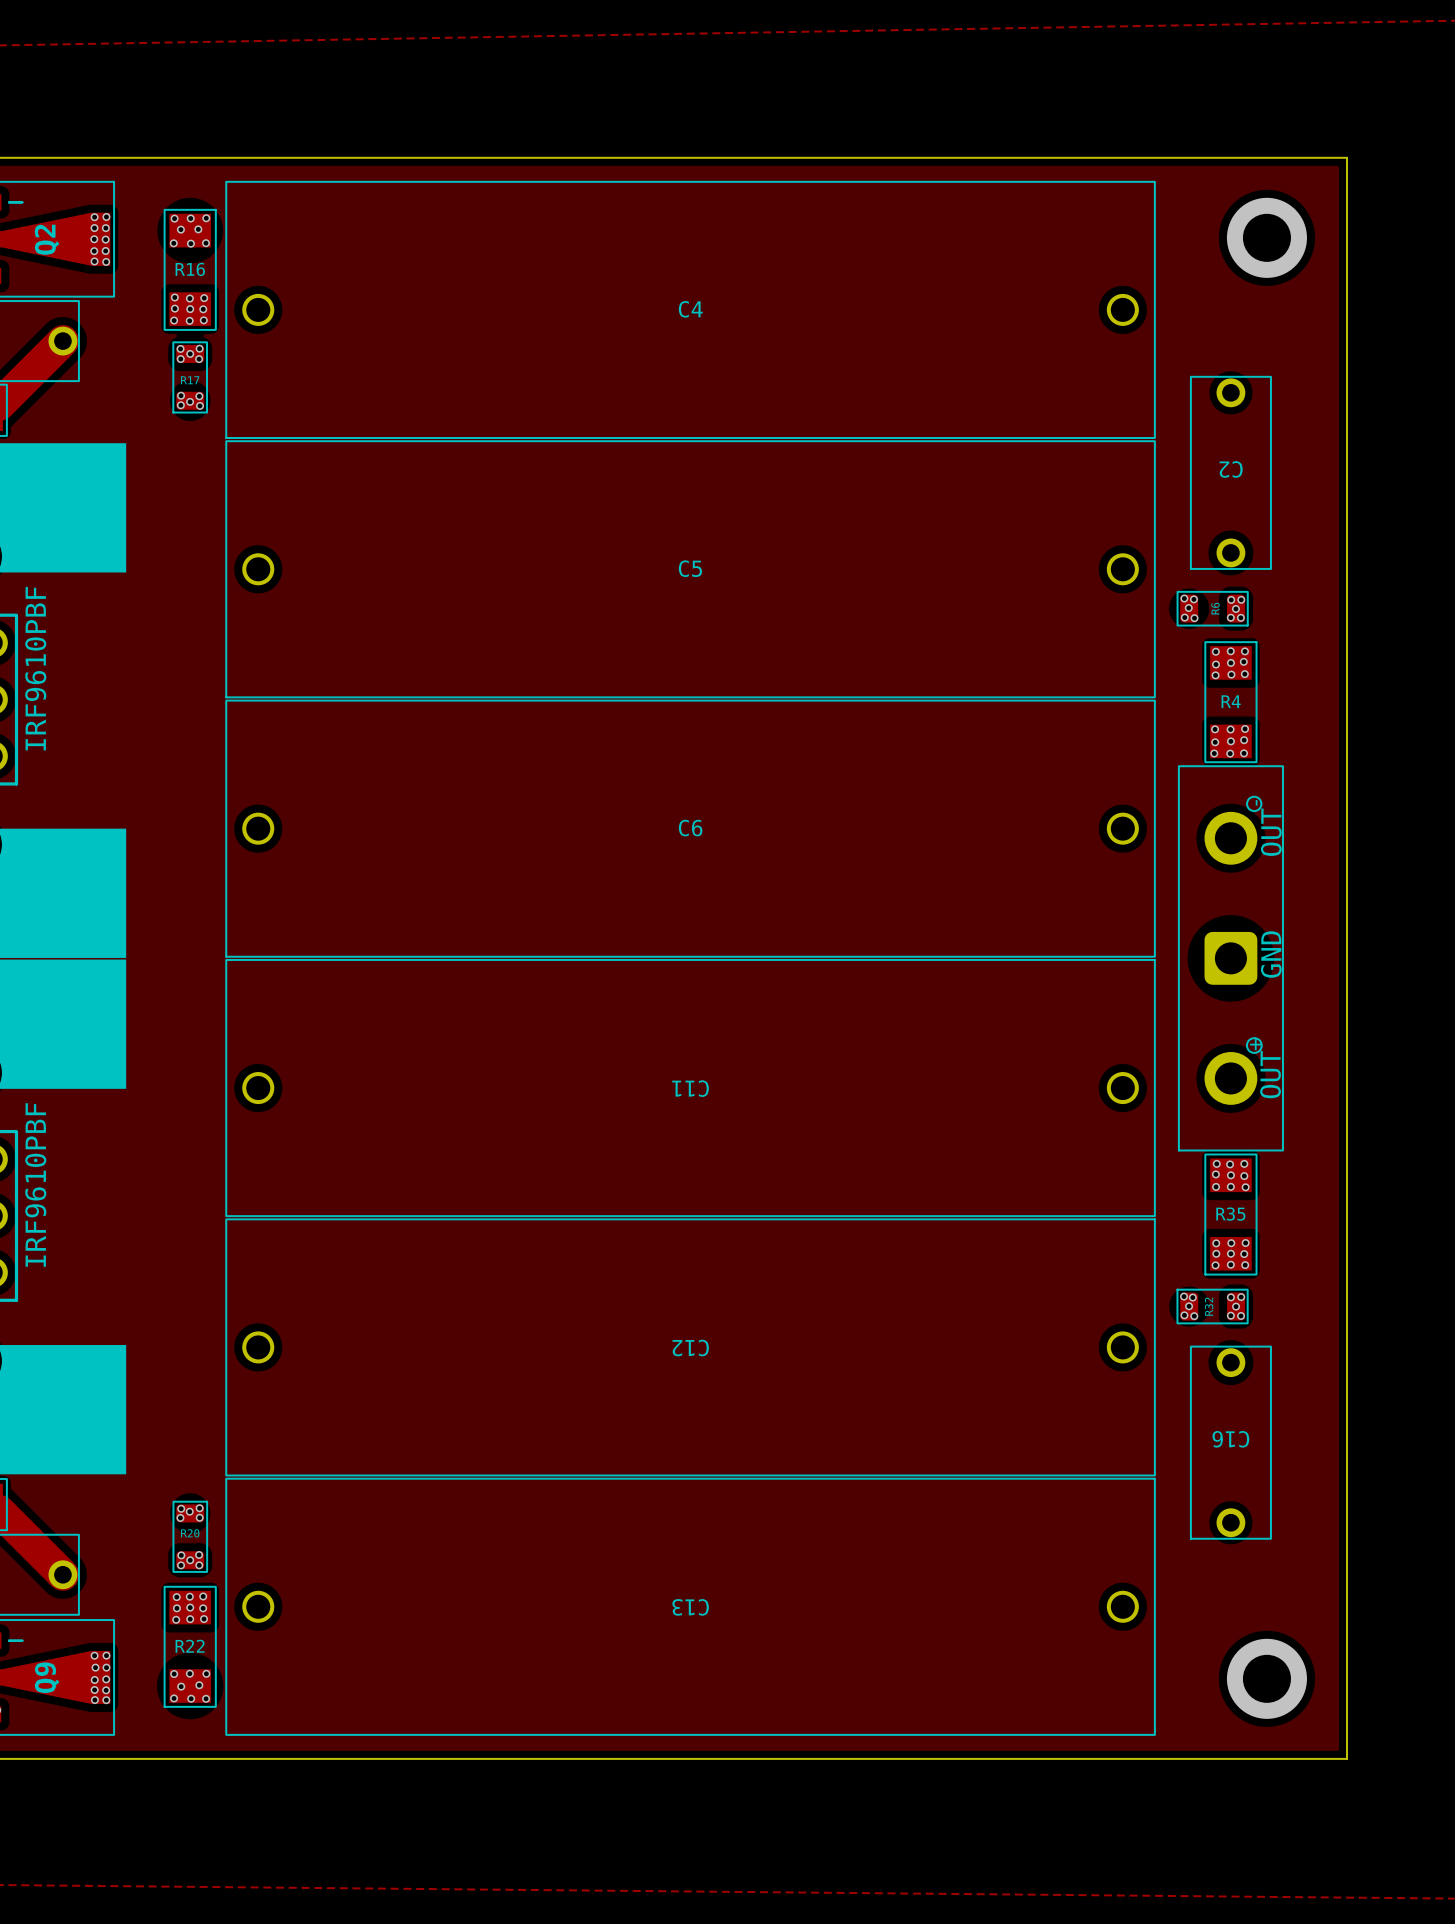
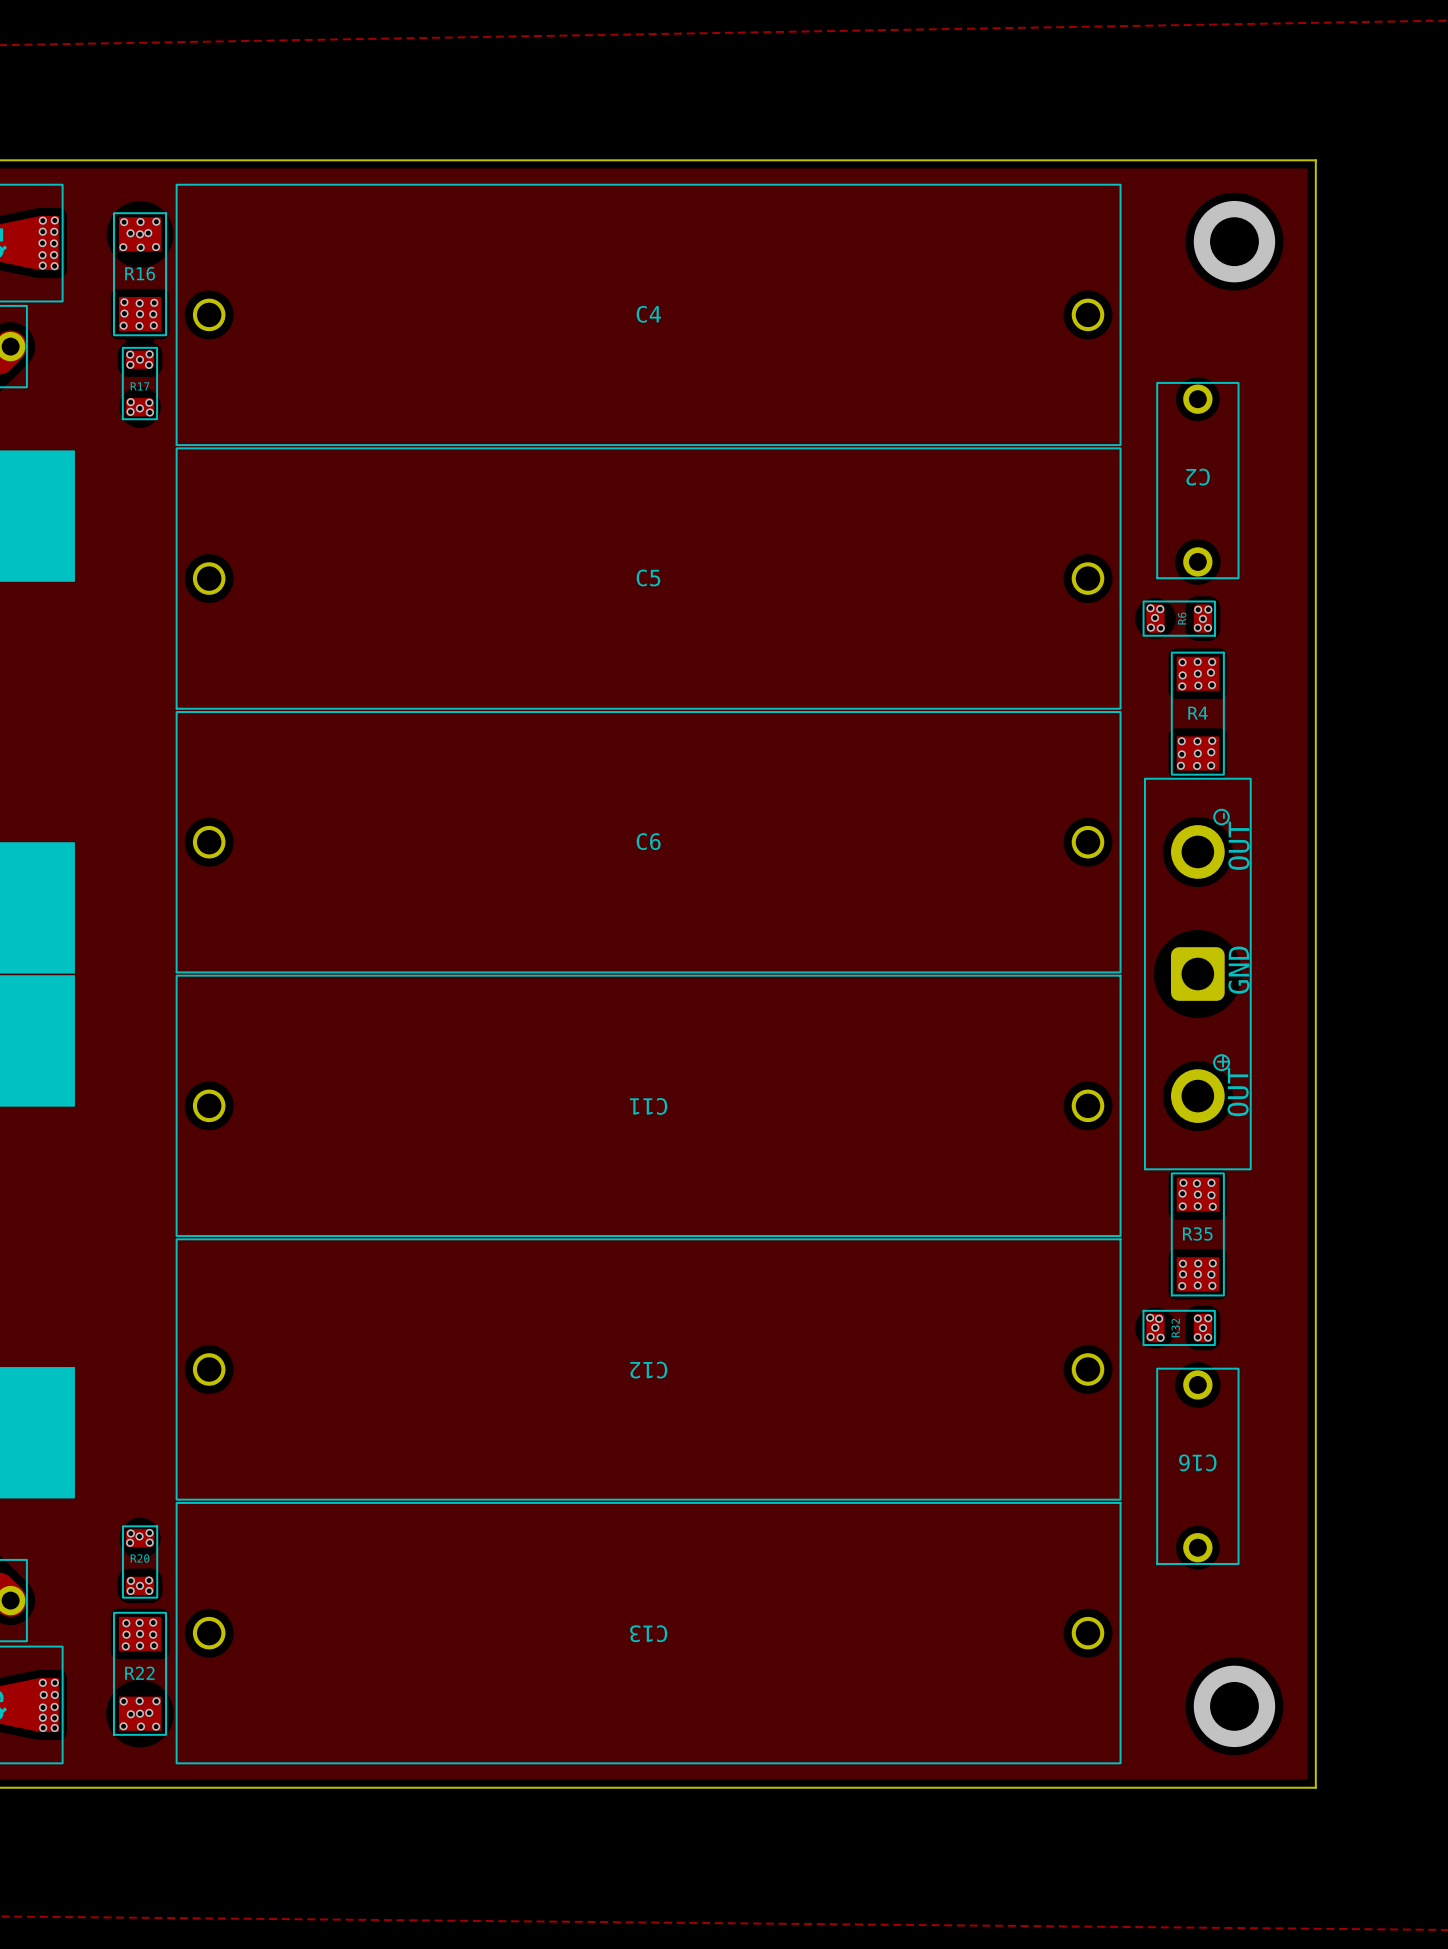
via: none -> (140, 234)
via: none -> (140, 1713)

